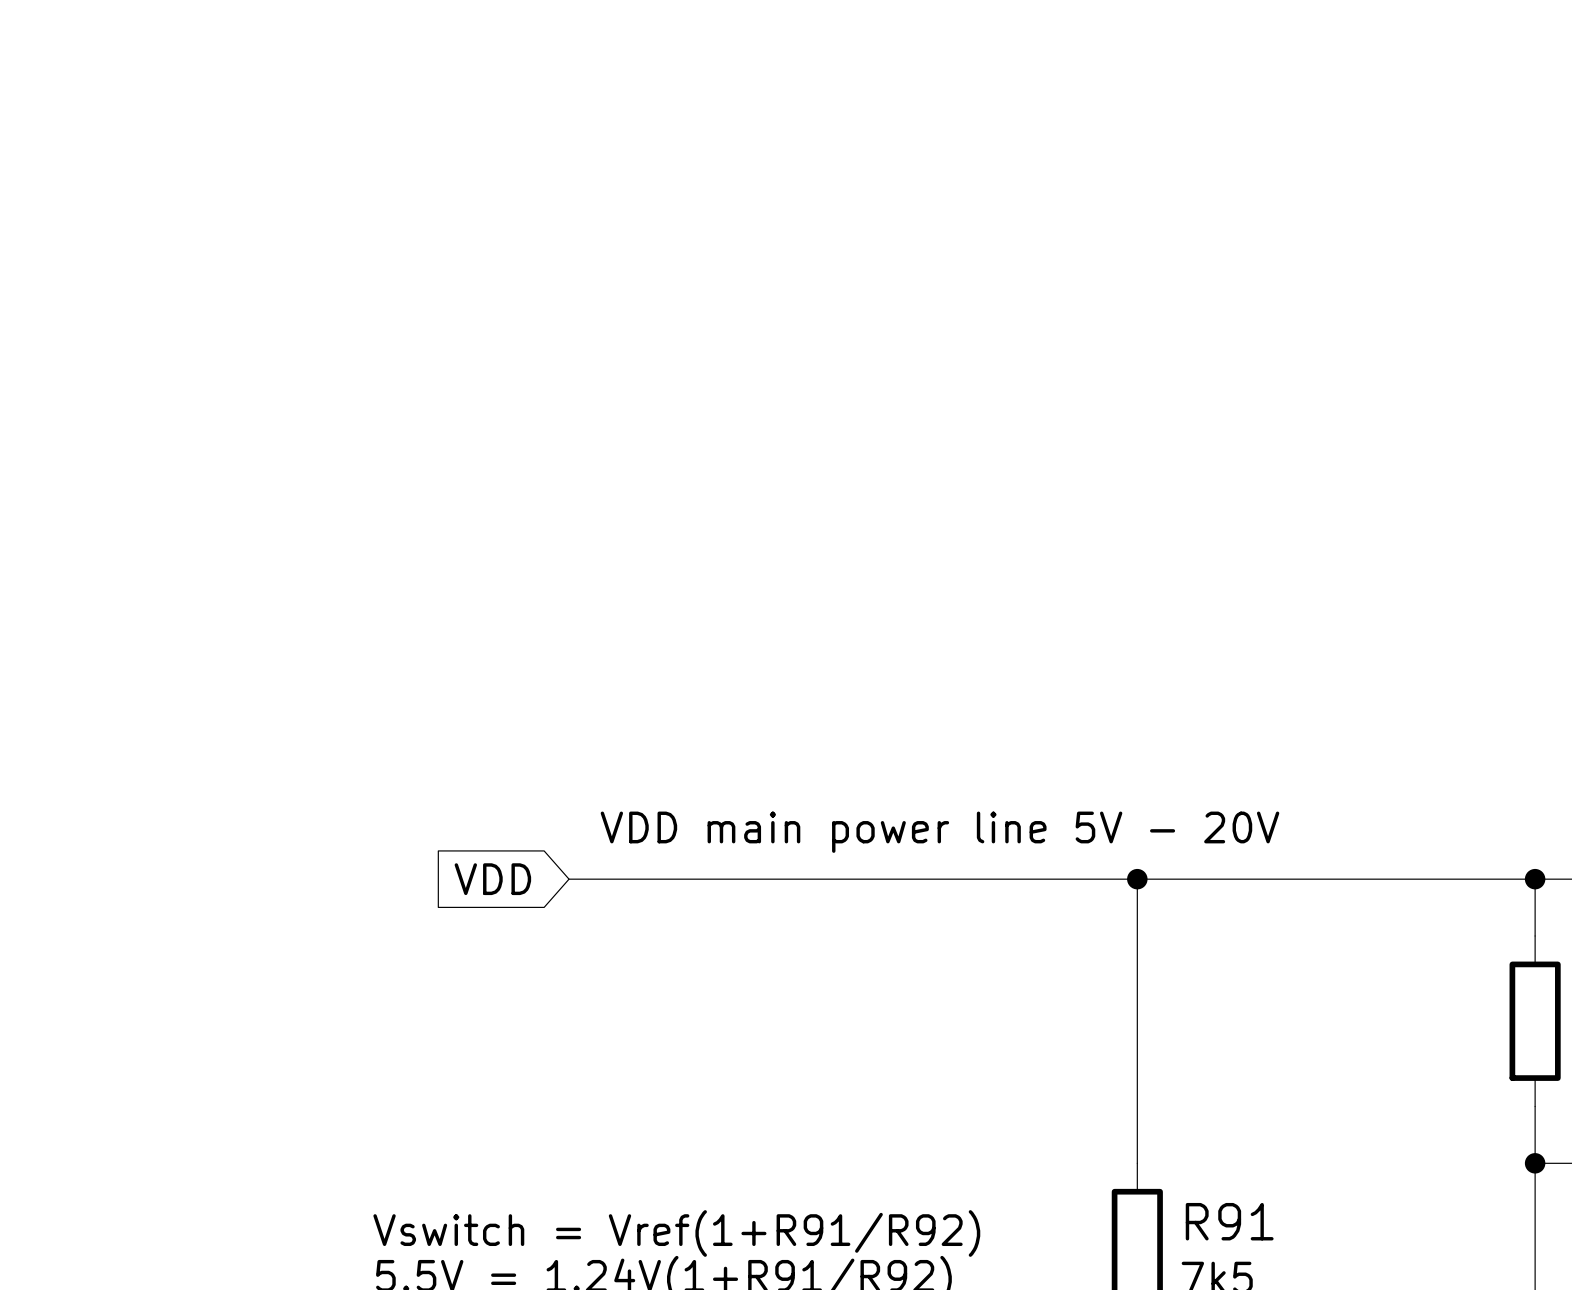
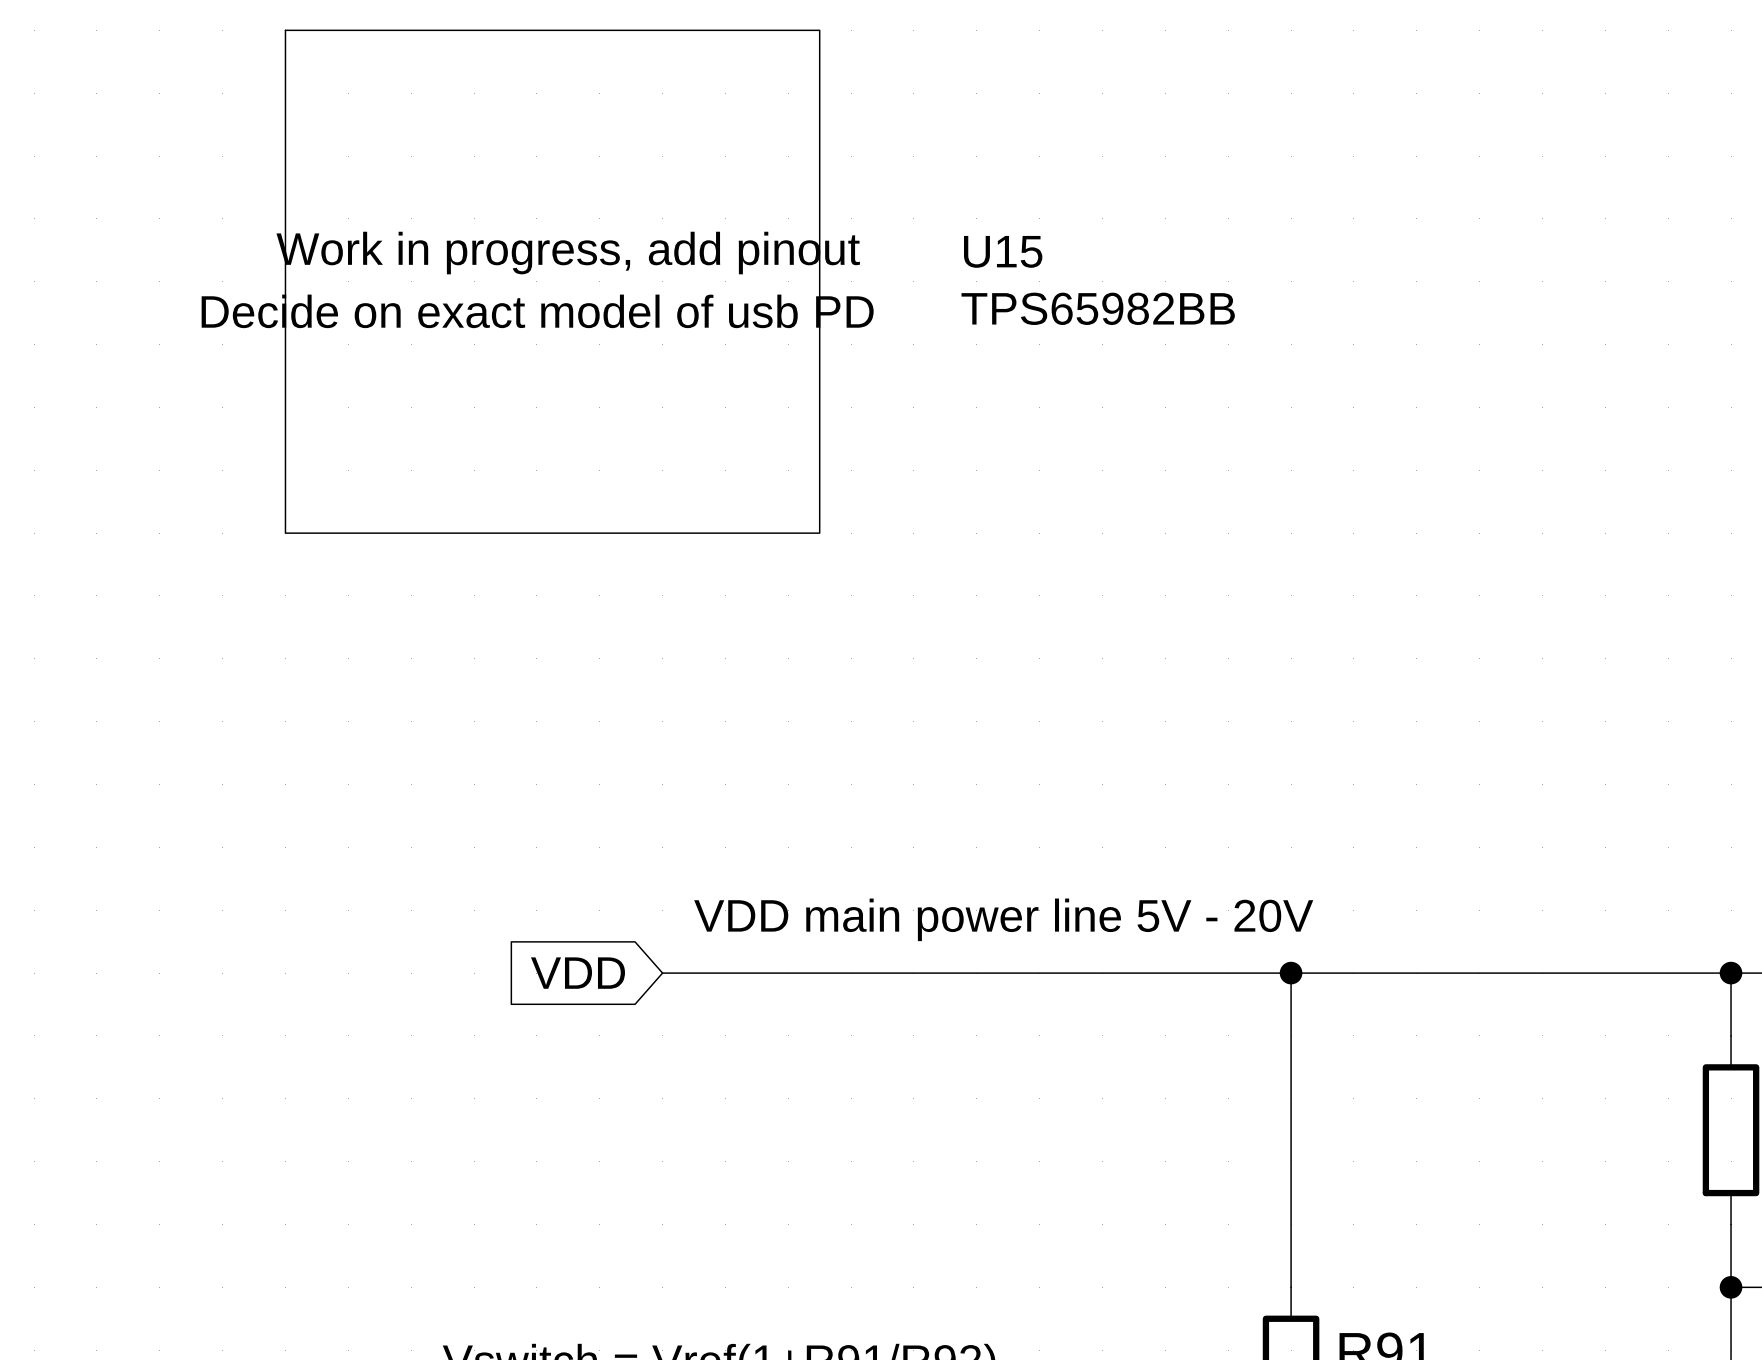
U15: none -> TPS65982BB (552, 281)

